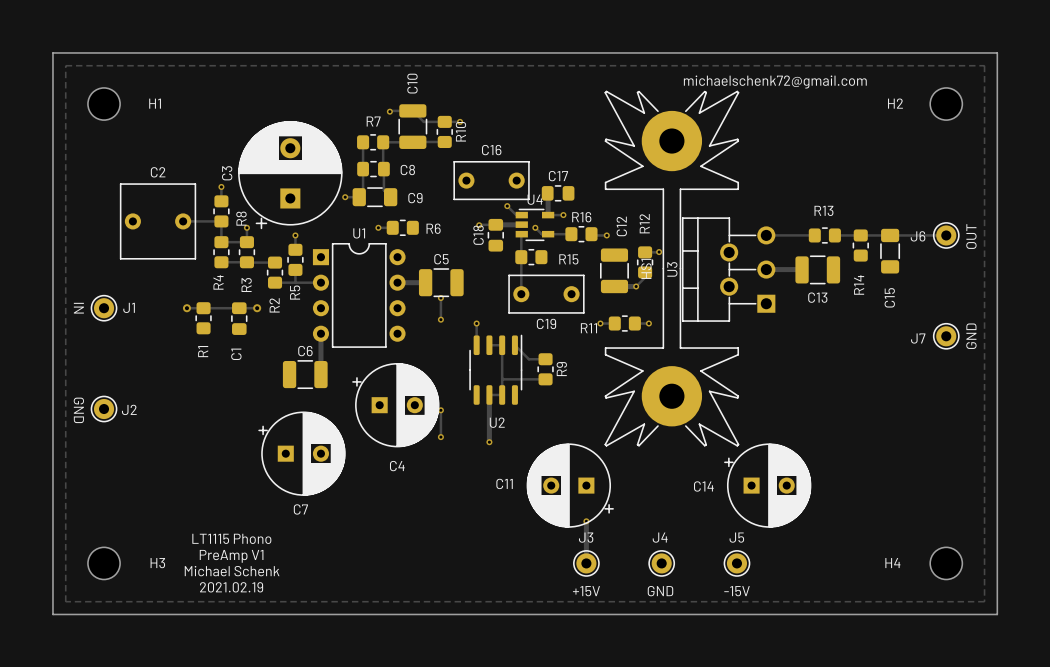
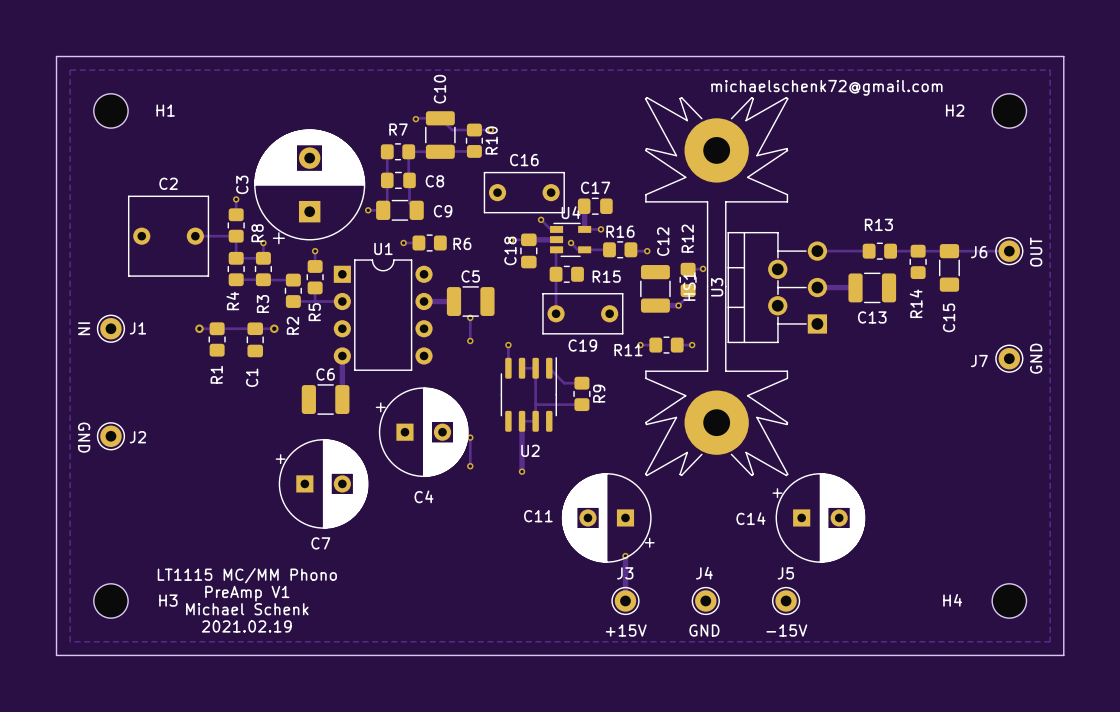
text: LT1115 Phono (231, 538) -> LT1115 MC/MM Phono (247, 575)

